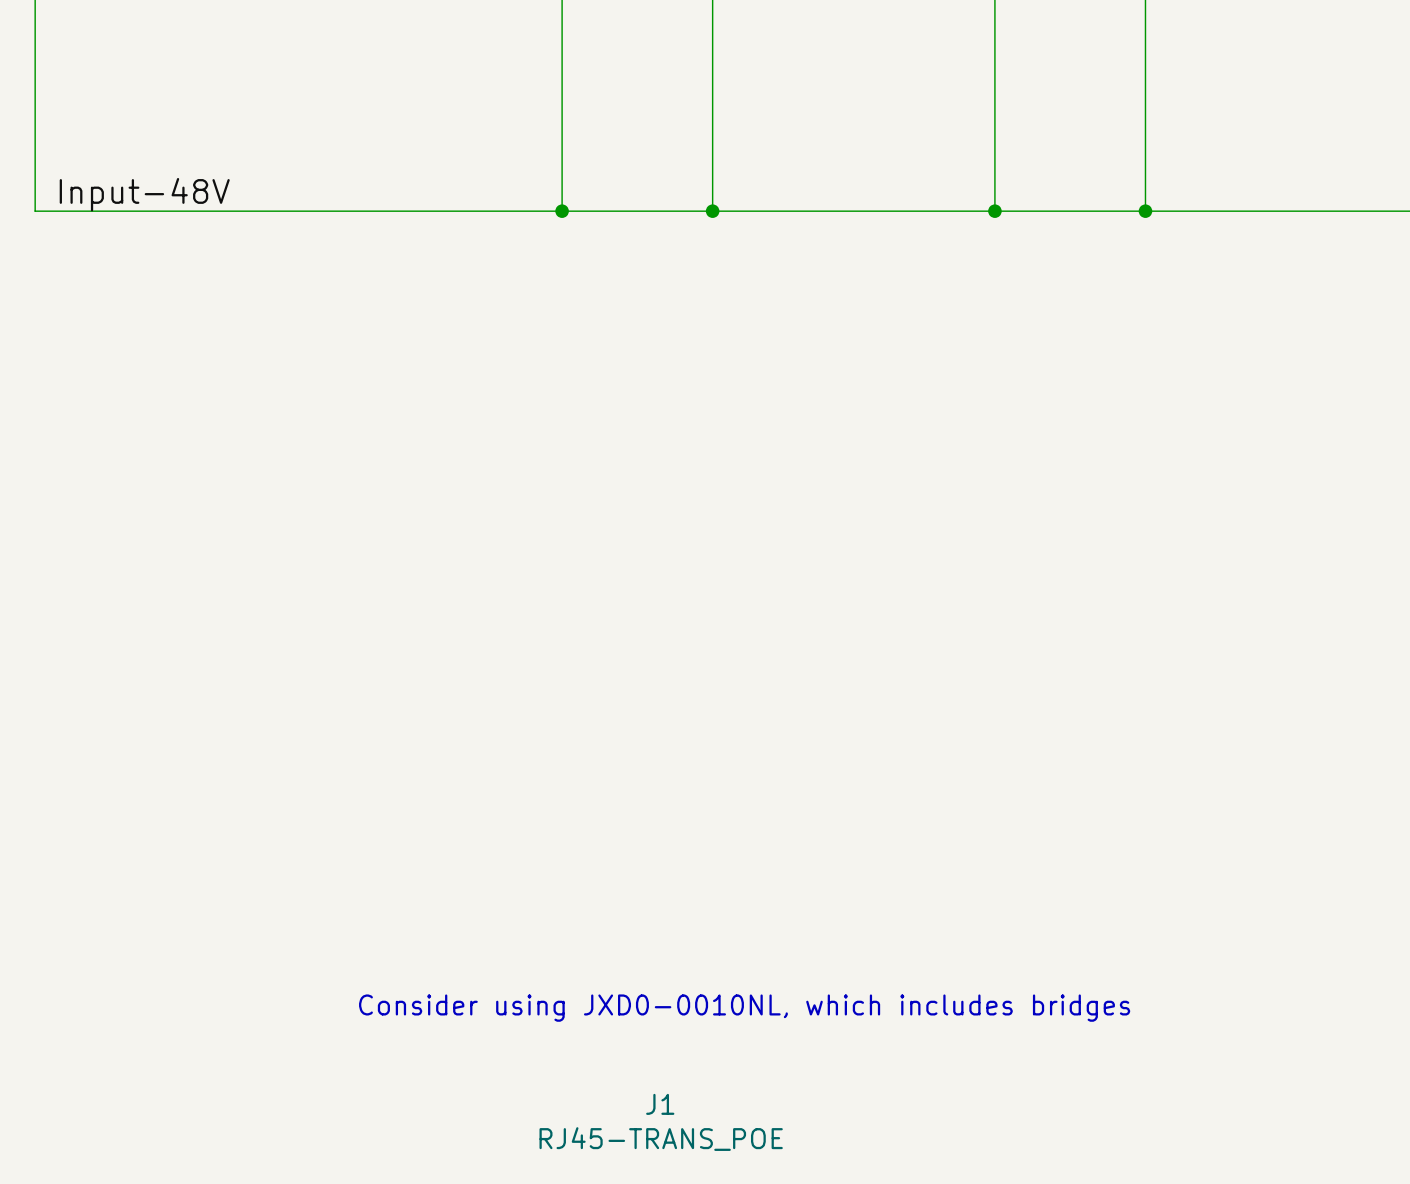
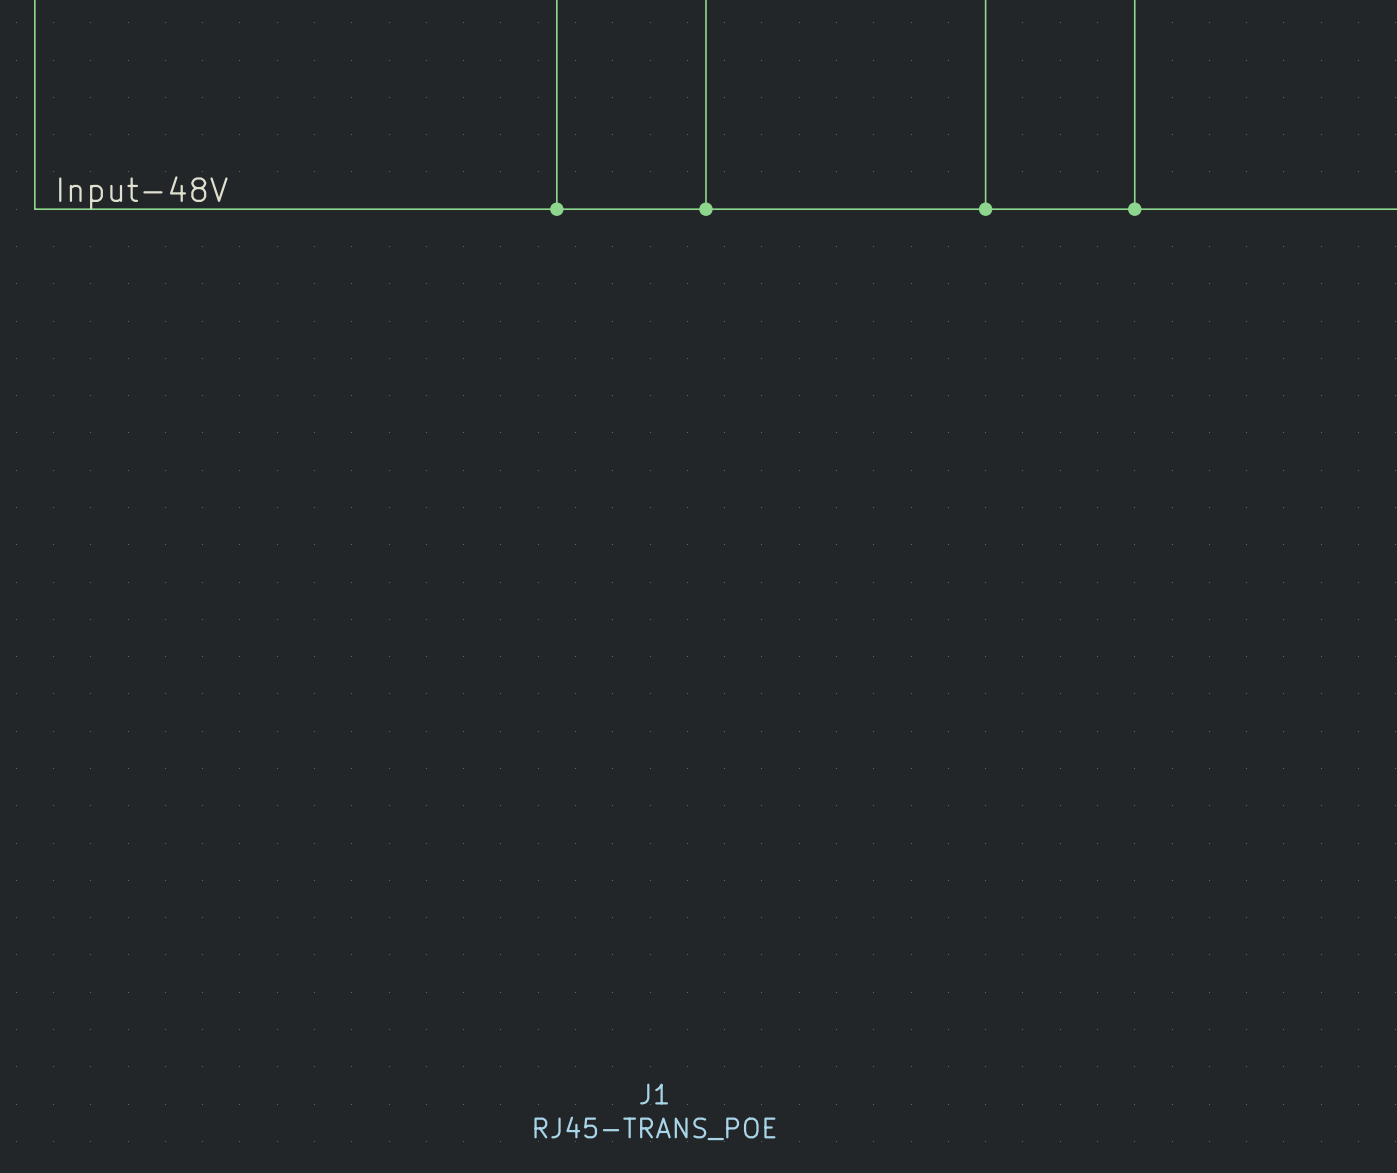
text: Consider using JXD0-0010NL, which includes bridges (744, 1008) -> none

